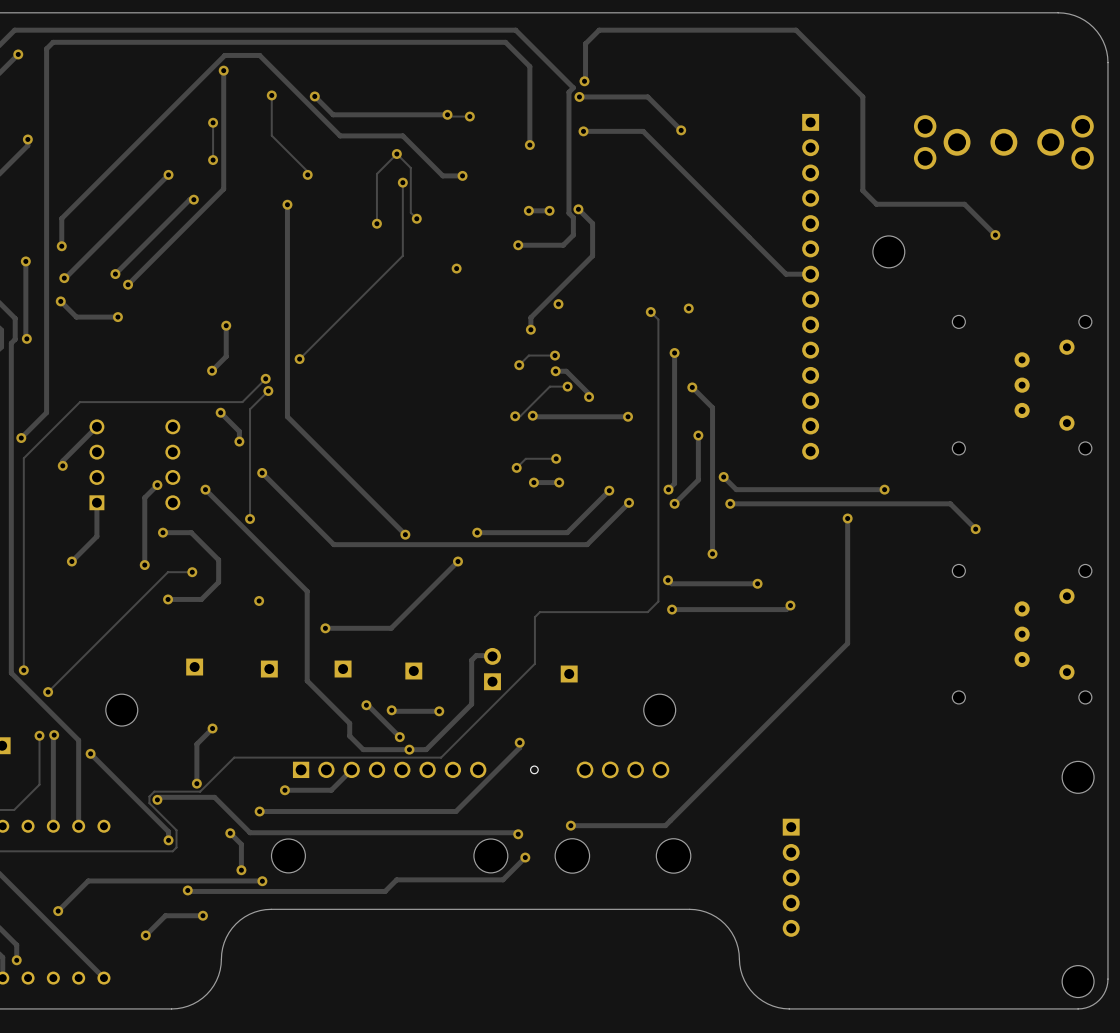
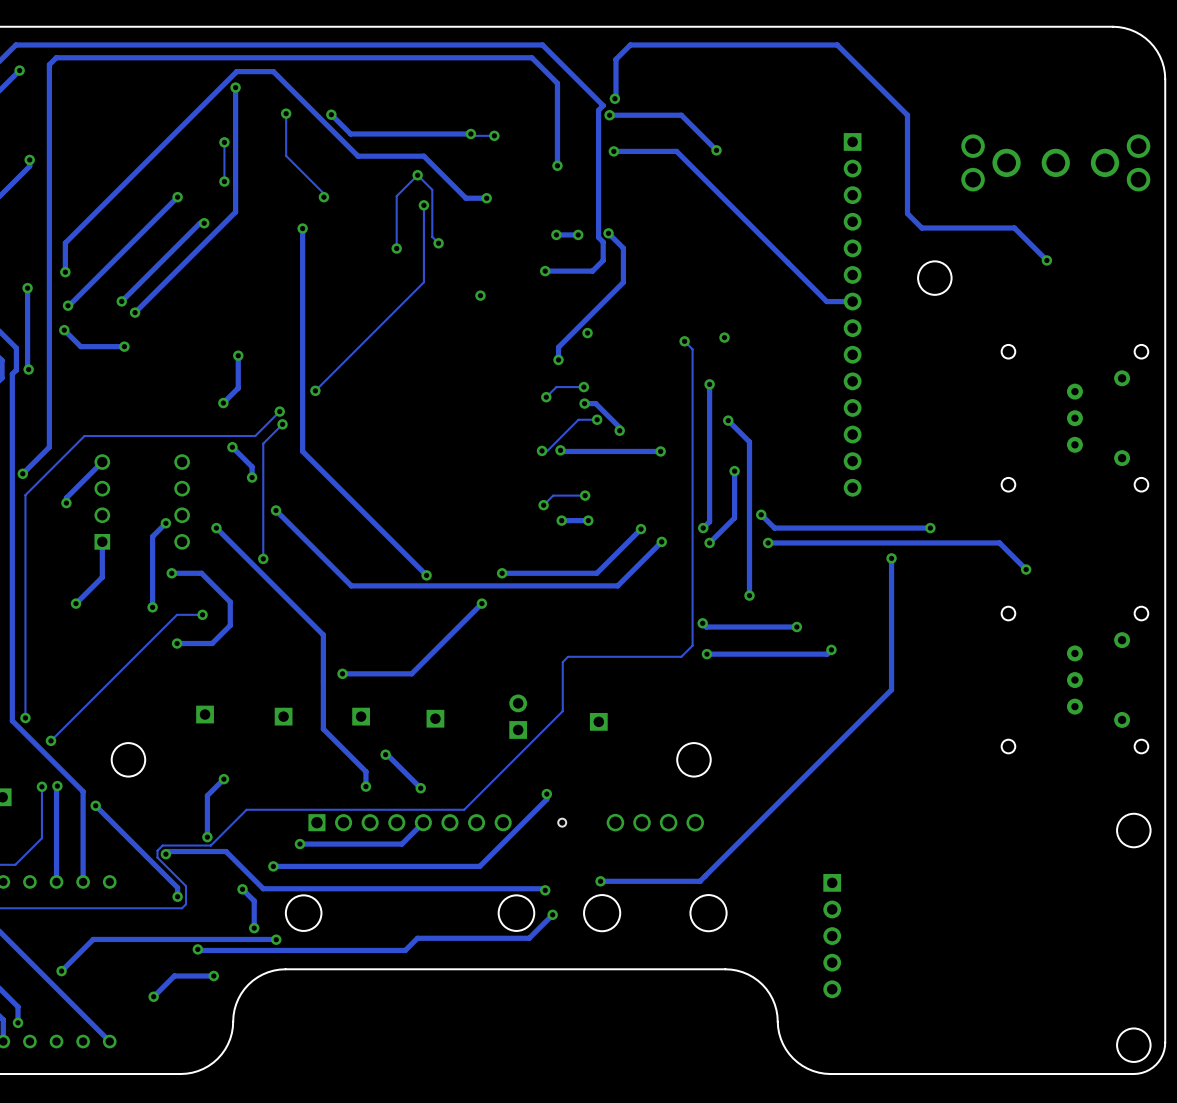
via: (259, 600) -> none
track: (492, 656) (476, 655) (471, 660) (471, 704) (426, 749) (363, 749) (349, 736) (349, 723) (347, 721) -> (365, 786) (365, 771)
track: (391, 710) (439, 711) -> none
via: (391, 710) -> none
via: (439, 711) -> none
via: none -> (365, 786)
via: (409, 749) -> none
track: (351, 769) (331, 790) -> (423, 822) (401, 844) (348, 844)

